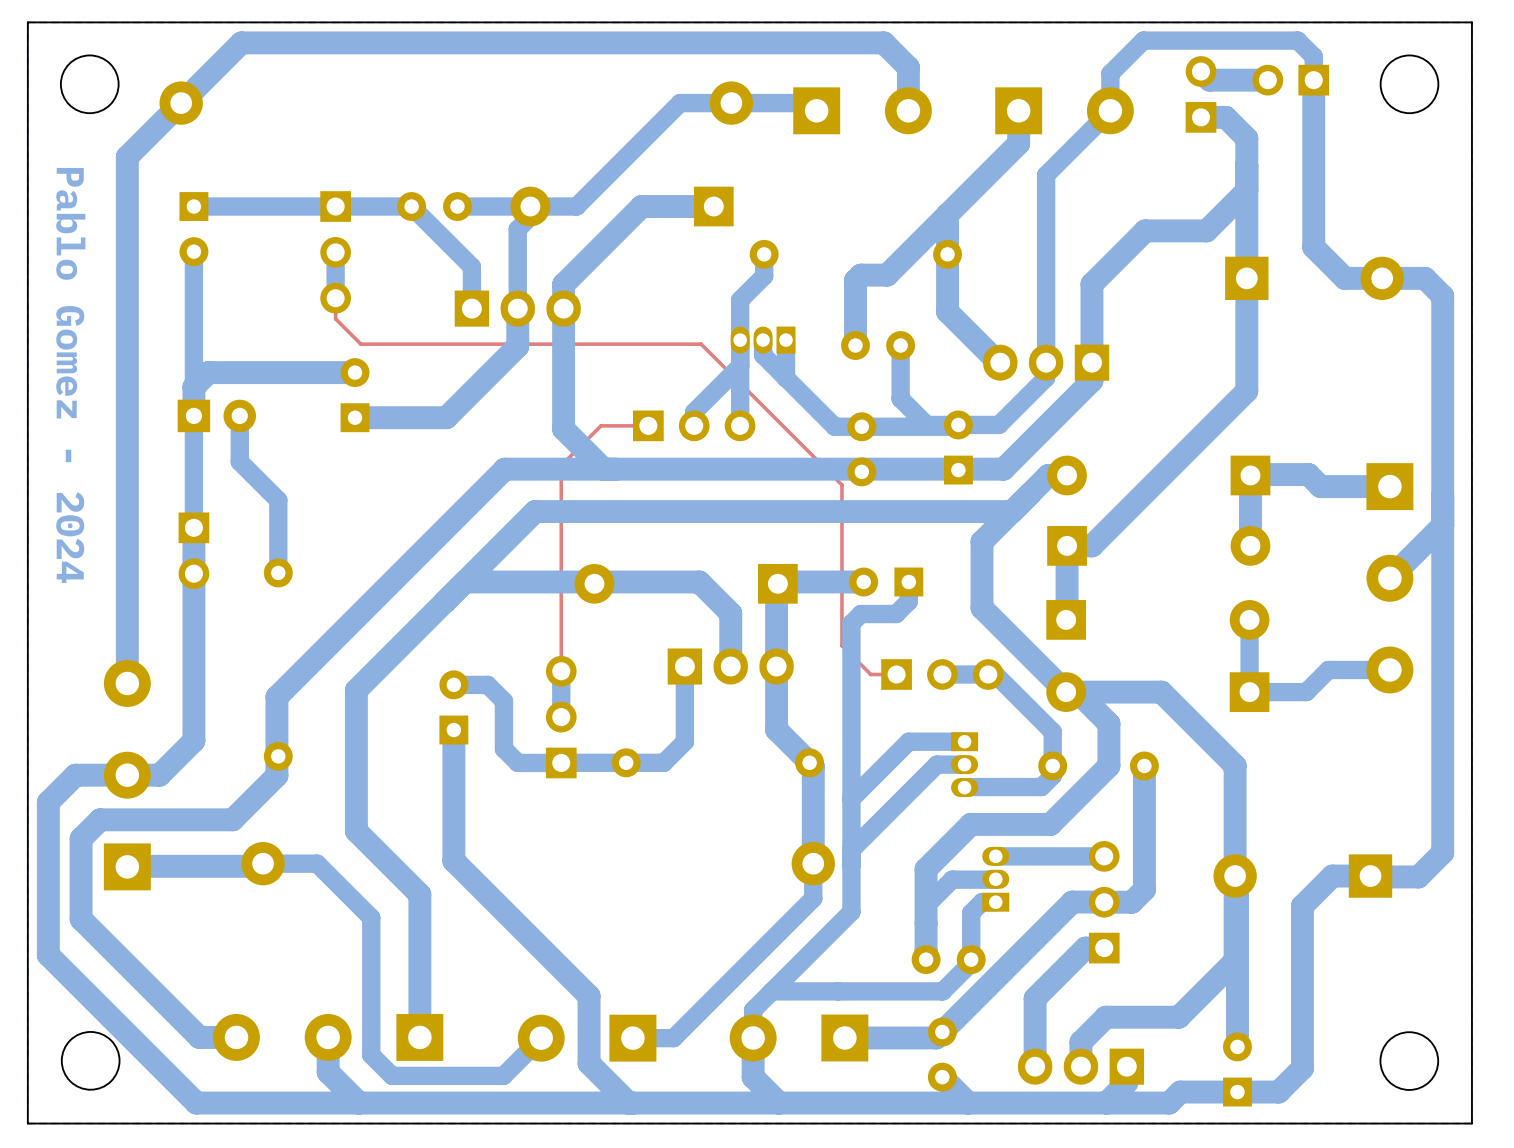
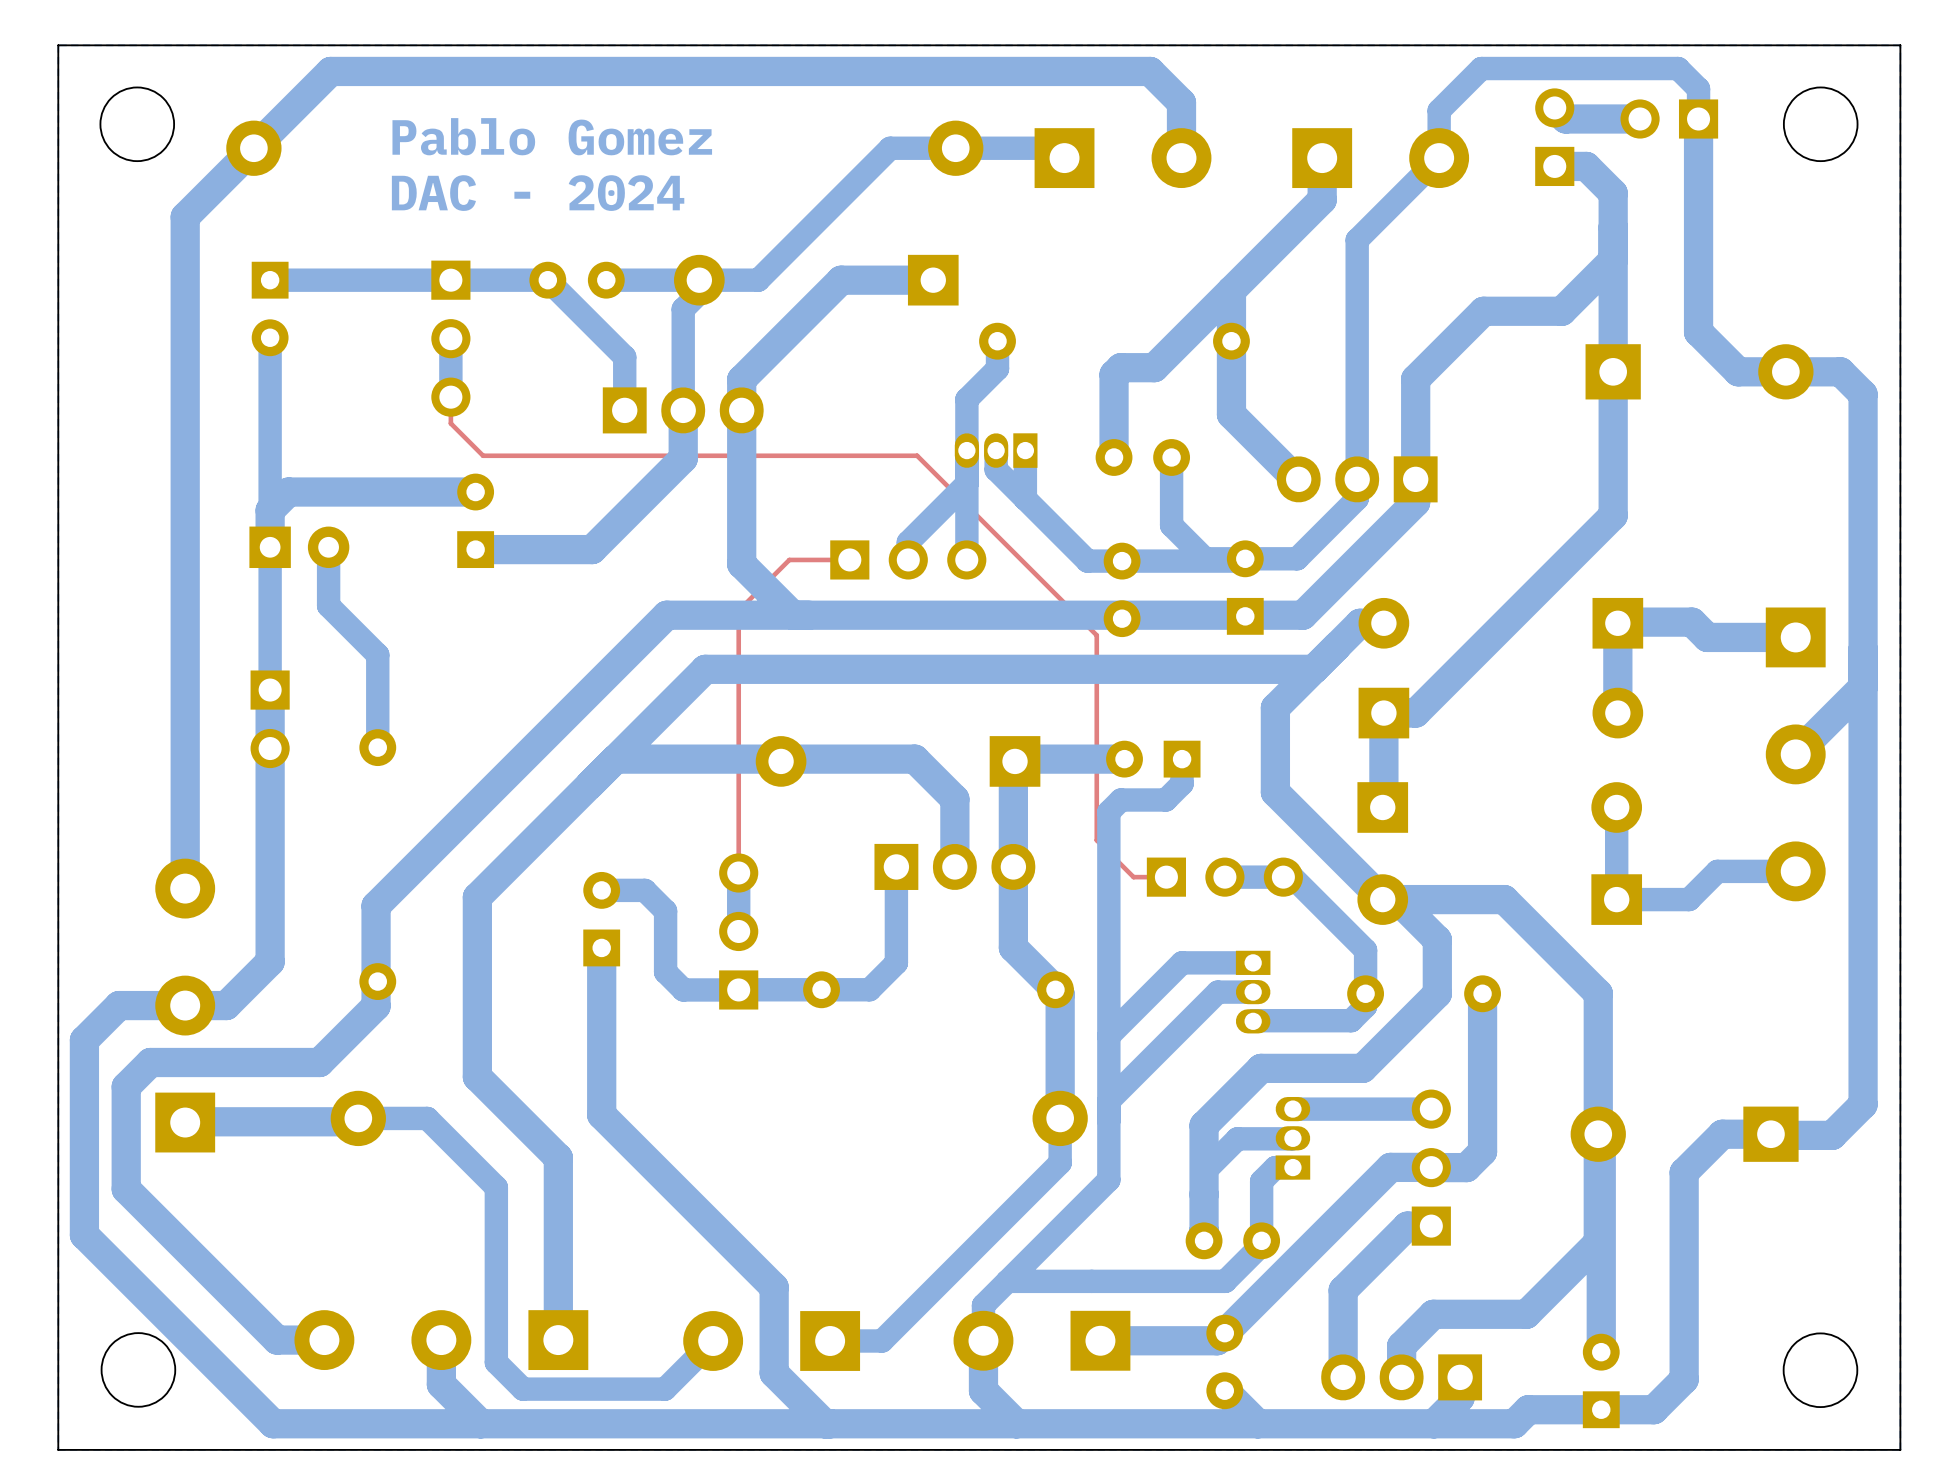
text: none -> Pablo Gomez (552, 136)
text: none -> DAC - 2024 (538, 193)
text: Pablo Gomez - 2024 (70, 375) -> none

